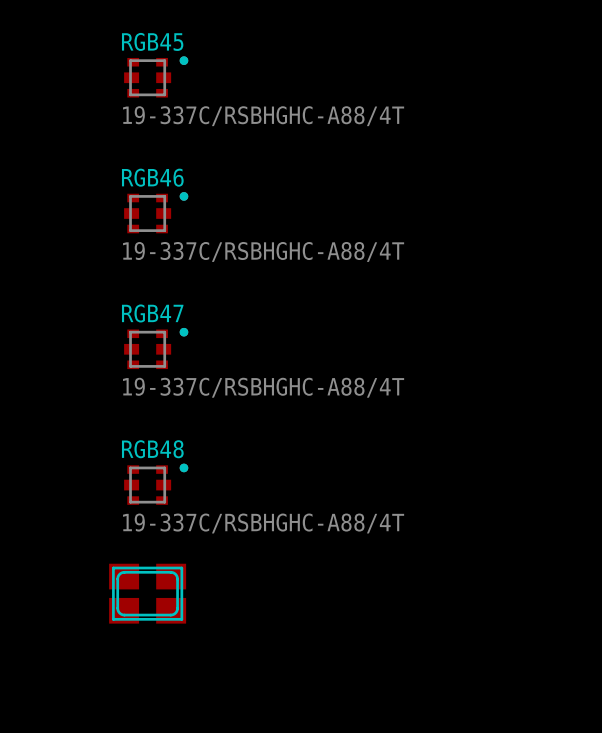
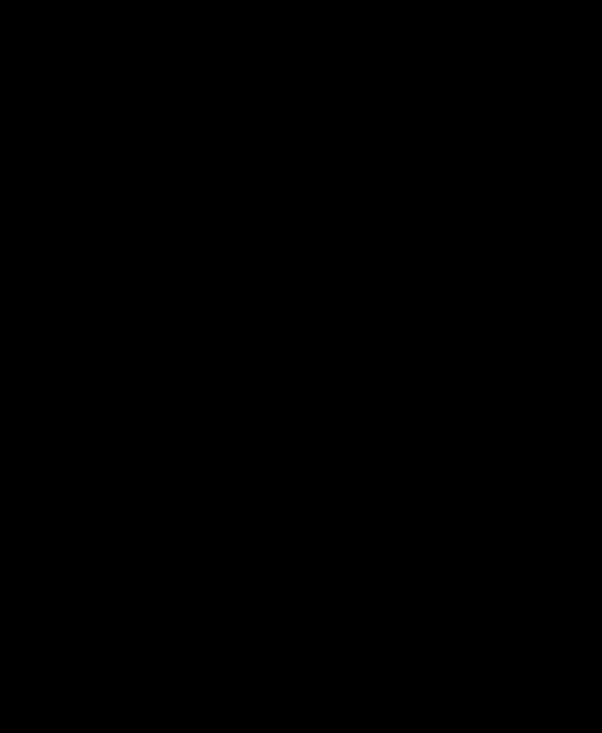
RGB45: 19-337C/RSBHGHC-A88/4T (156, 76) -> none
RGB46: 19-337C/RSBHGHC-A88/4T (156, 212) -> none
RGB47: 19-337C/RSBHGHC-A88/4T (156, 348) -> none
RGB48: 19-337C/RSBHGHC-A88/4T (156, 484) -> none
part: (147, 593) -> none

